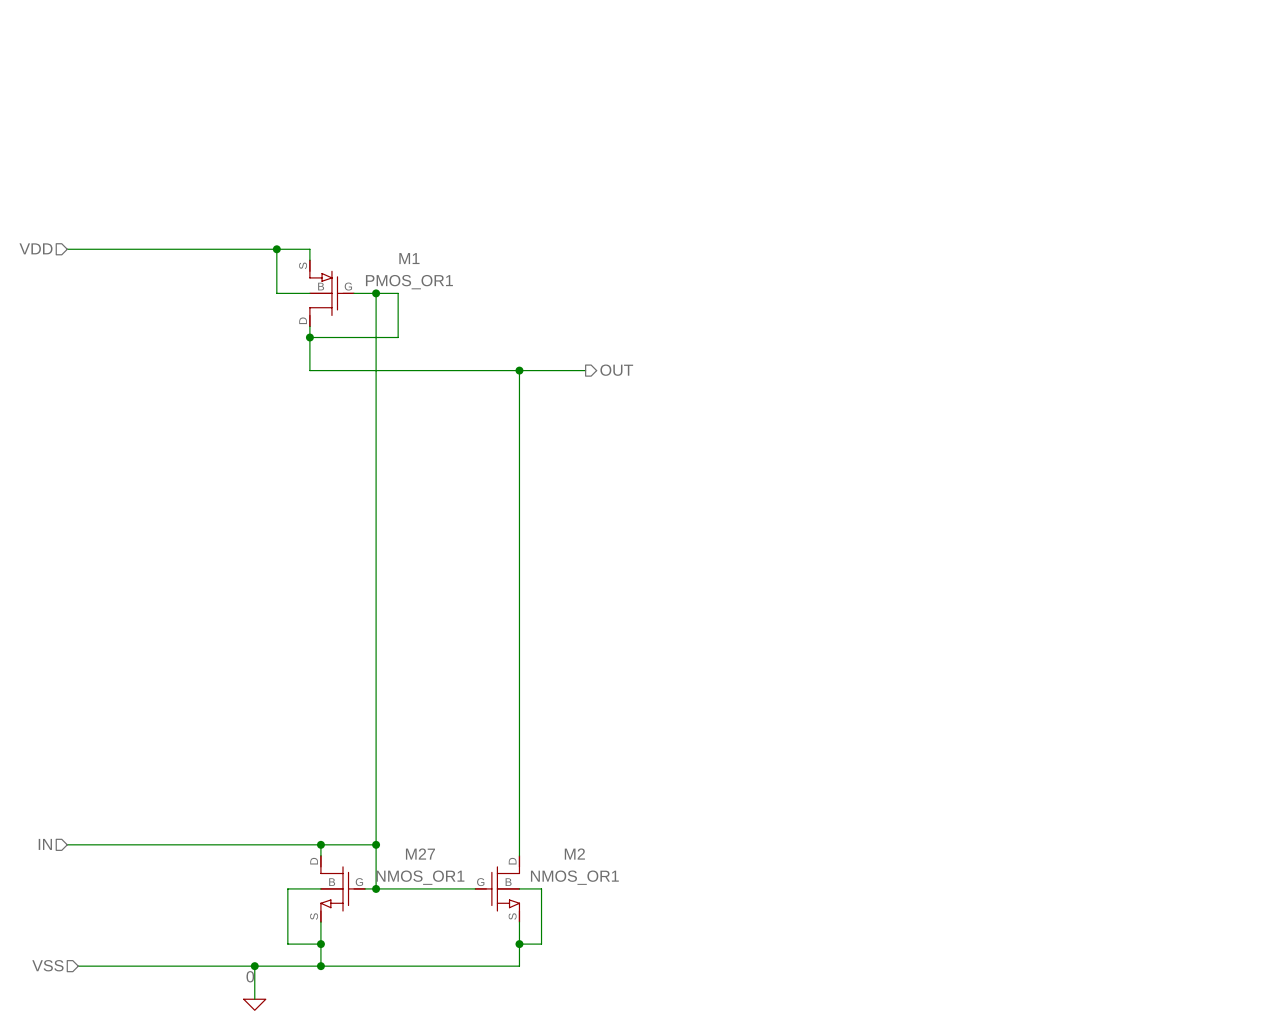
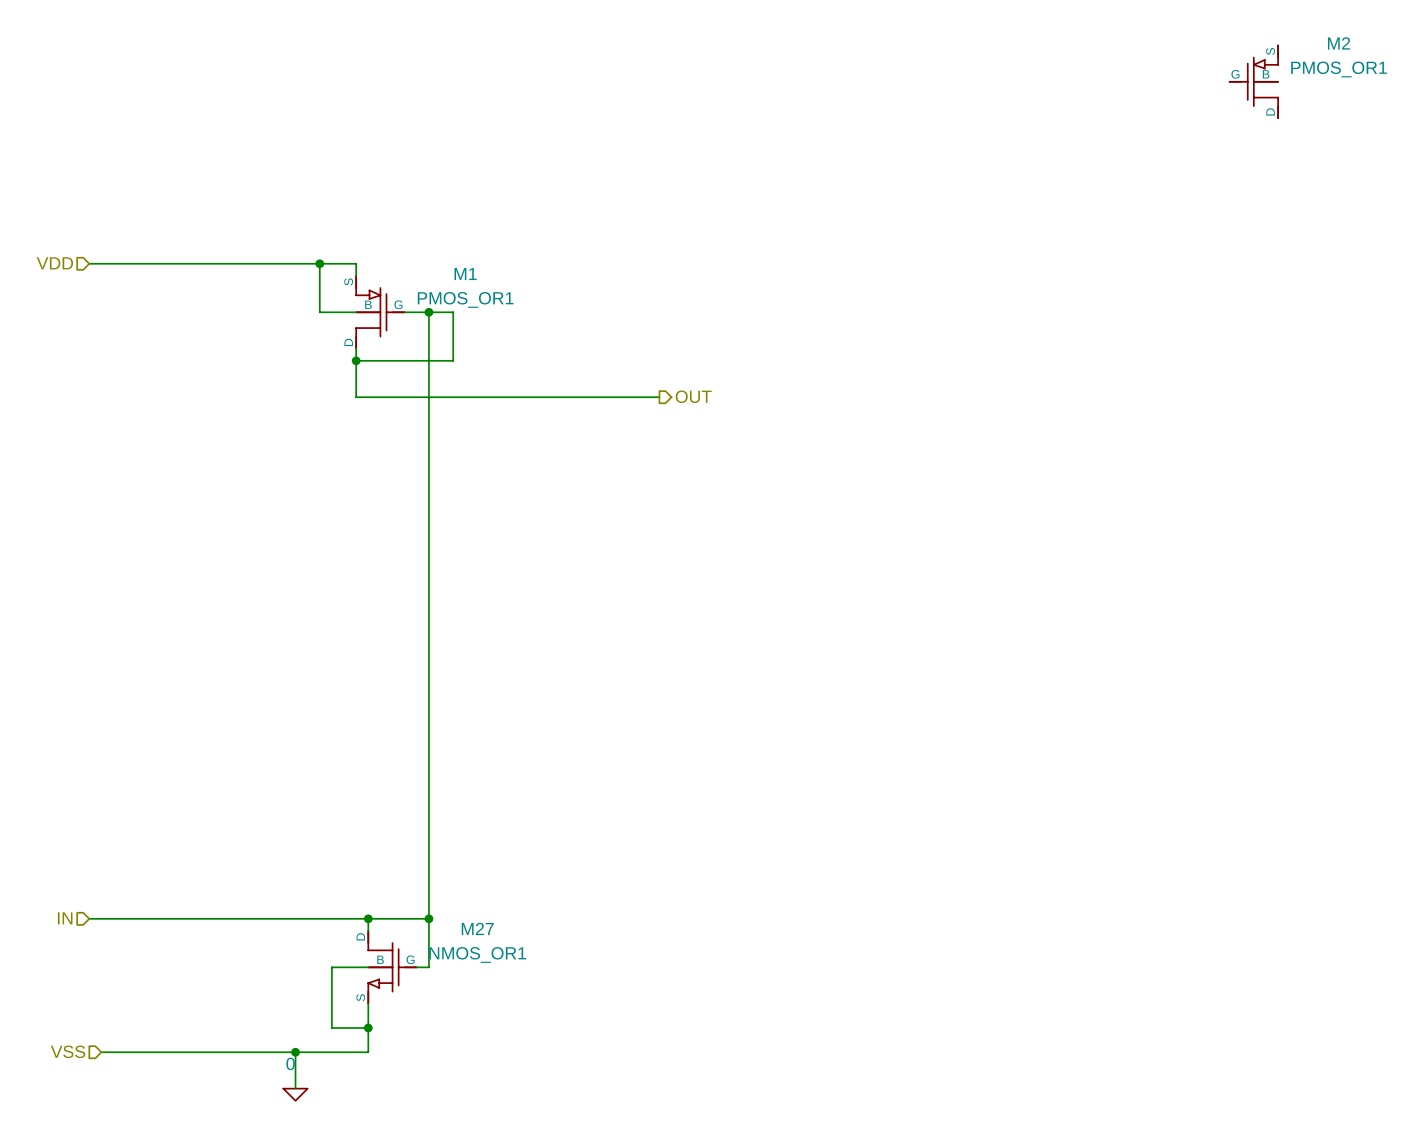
wire: (519, 370) (519, 855) -> none
junction: (519, 370) -> none
M2 symbol: [475, 855, 520, 923] -> [1229, 45, 1279, 119]
M2 value: NMOS_OR1 (574, 877) -> PMOS_OR1 (1339, 69)
wire: (376, 888) (475, 888) -> none
junction: (376, 888) -> none
wire: (519, 888) (541, 888) (541, 944) (519, 944) -> none
wire: (519, 922) (519, 966) (320, 966) -> none
junction: (519, 944) -> none
junction: (320, 966) -> none

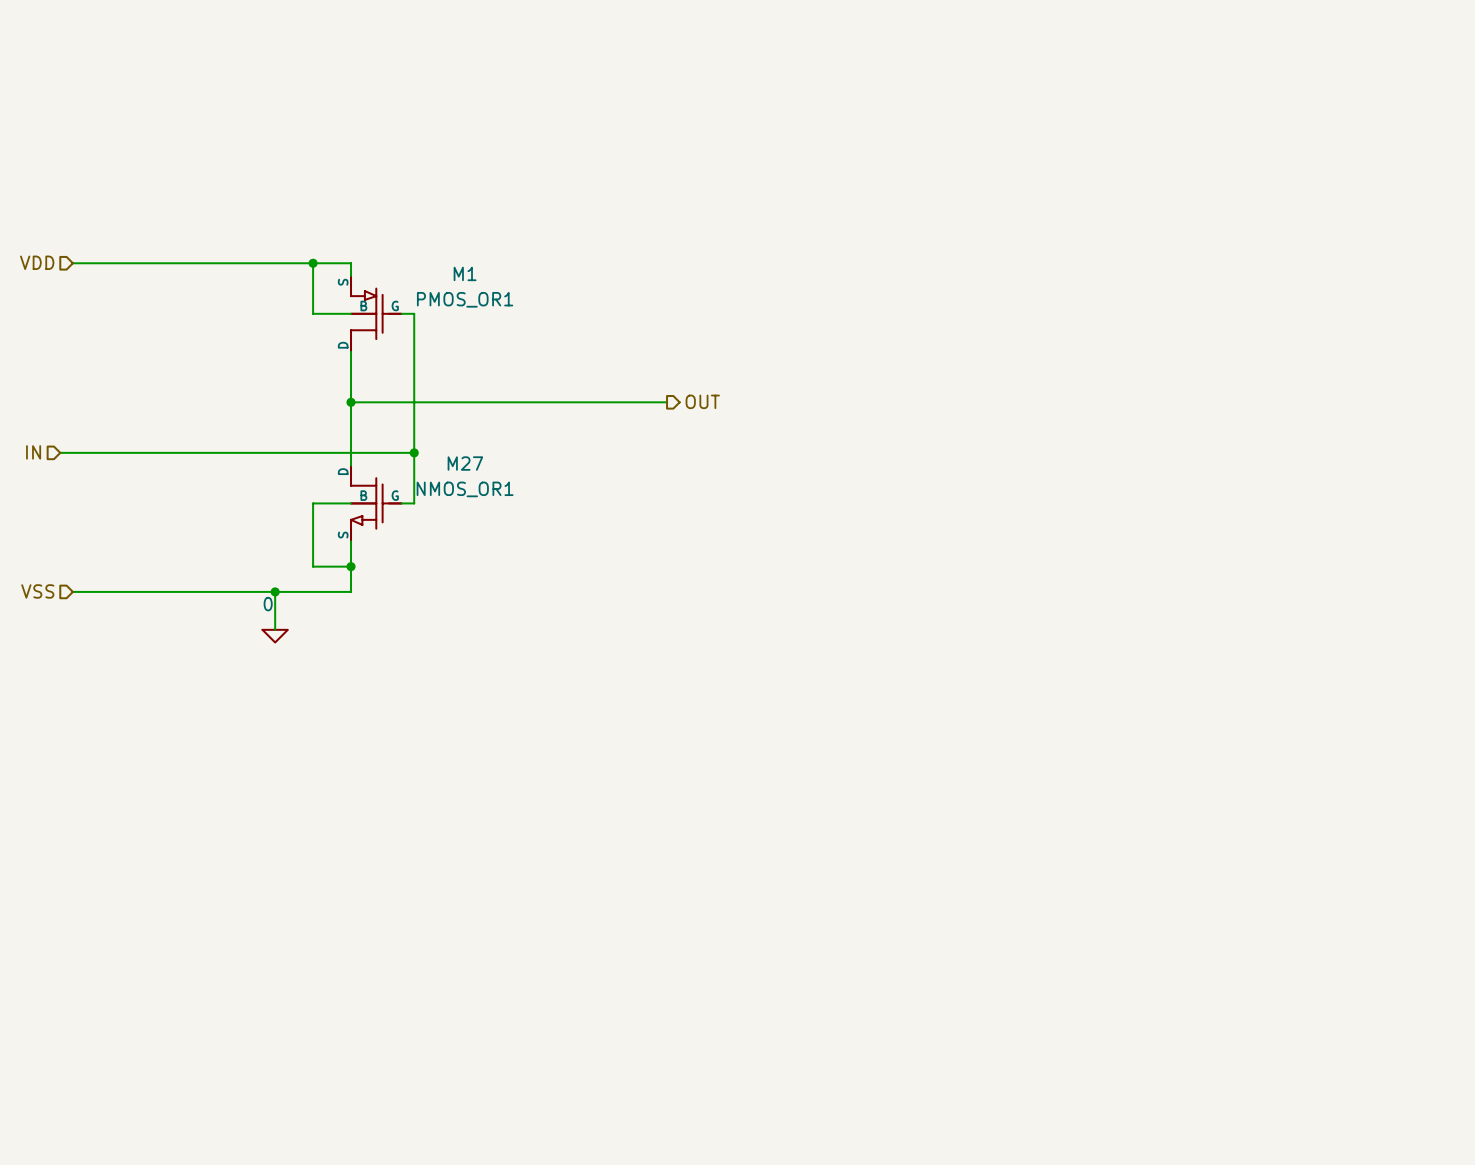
M2: PMOS_OR1 (1253, 81) -> none
wire: (416, 312) (453, 312) (453, 360) (356, 360) -> (414, 313) (414, 503) (401, 503)
wire: (428, 312) (428, 967) (416, 967) -> none
junction: (428, 312) -> none
junction position: (356, 360) -> (351, 402)
wire: none -> (351, 402) (351, 465)
hierarchical label: none -> IN (33, 452)
wire: none -> (60, 452) (414, 452)
junction: none -> (414, 452)
wire: none -> (351, 503) (313, 503) (313, 566) (351, 566)
wire: none -> (351, 541) (351, 591) (72, 591)
junction: none -> (351, 566)
hierarchical label: none -> VSS (37, 591)
wire: none -> (275, 591) (275, 629)
junction: none -> (275, 591)
power symbol: none -> 0 (275, 636)
hierarchical label: IN (65, 918) -> none
wire: (89, 918) (428, 918) -> none
wire: (368, 918) (368, 930) -> none
junction: (368, 918) -> none
junction: (428, 918) -> none
wire: (368, 967) (331, 967) (331, 1027) (368, 1027) -> none
M27 position: (392, 967) -> (376, 503)
wire: (368, 1003) (368, 1052) (101, 1052) -> none
junction: (368, 1027) -> none
hierarchical label: VSS (68, 1051) -> none
wire: (295, 1052) (295, 1088) -> none
junction: (295, 1052) -> none
power symbol: 0 (295, 1094) -> none

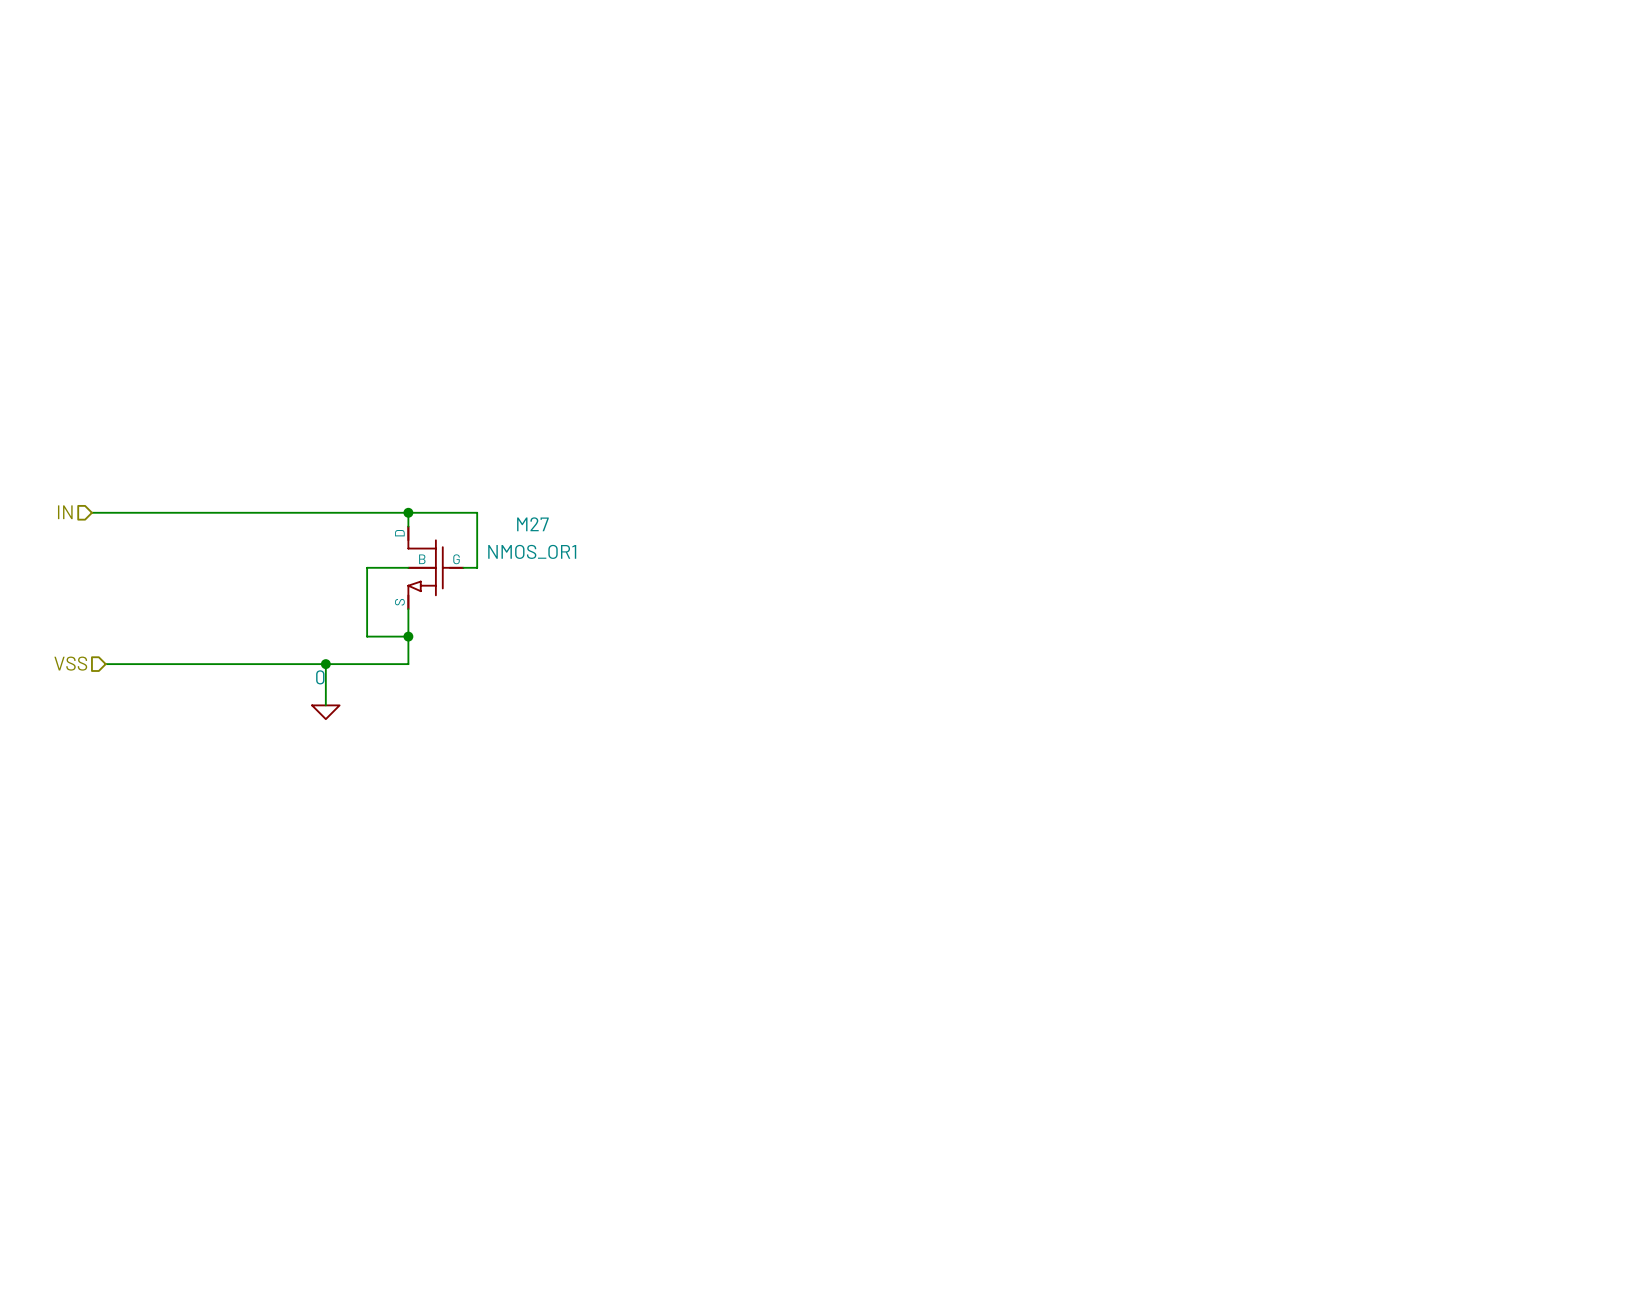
hierarchical label: VDD (37, 262) -> none
wire: (72, 263) (351, 263) (351, 275) -> none
wire: (313, 263) (313, 313) (351, 313) -> none
junction: (313, 263) -> none
M1: PMOS_OR1 (376, 313) -> none
wire: (401, 313) (414, 313) (414, 452) -> none
wire: (351, 351) (351, 452) -> none
hierarchical label: OUT (702, 401) -> none
wire: (351, 402) (667, 402) -> none
junction: (351, 402) -> none
junction: none -> (408, 512)
junction: (414, 452) -> none

